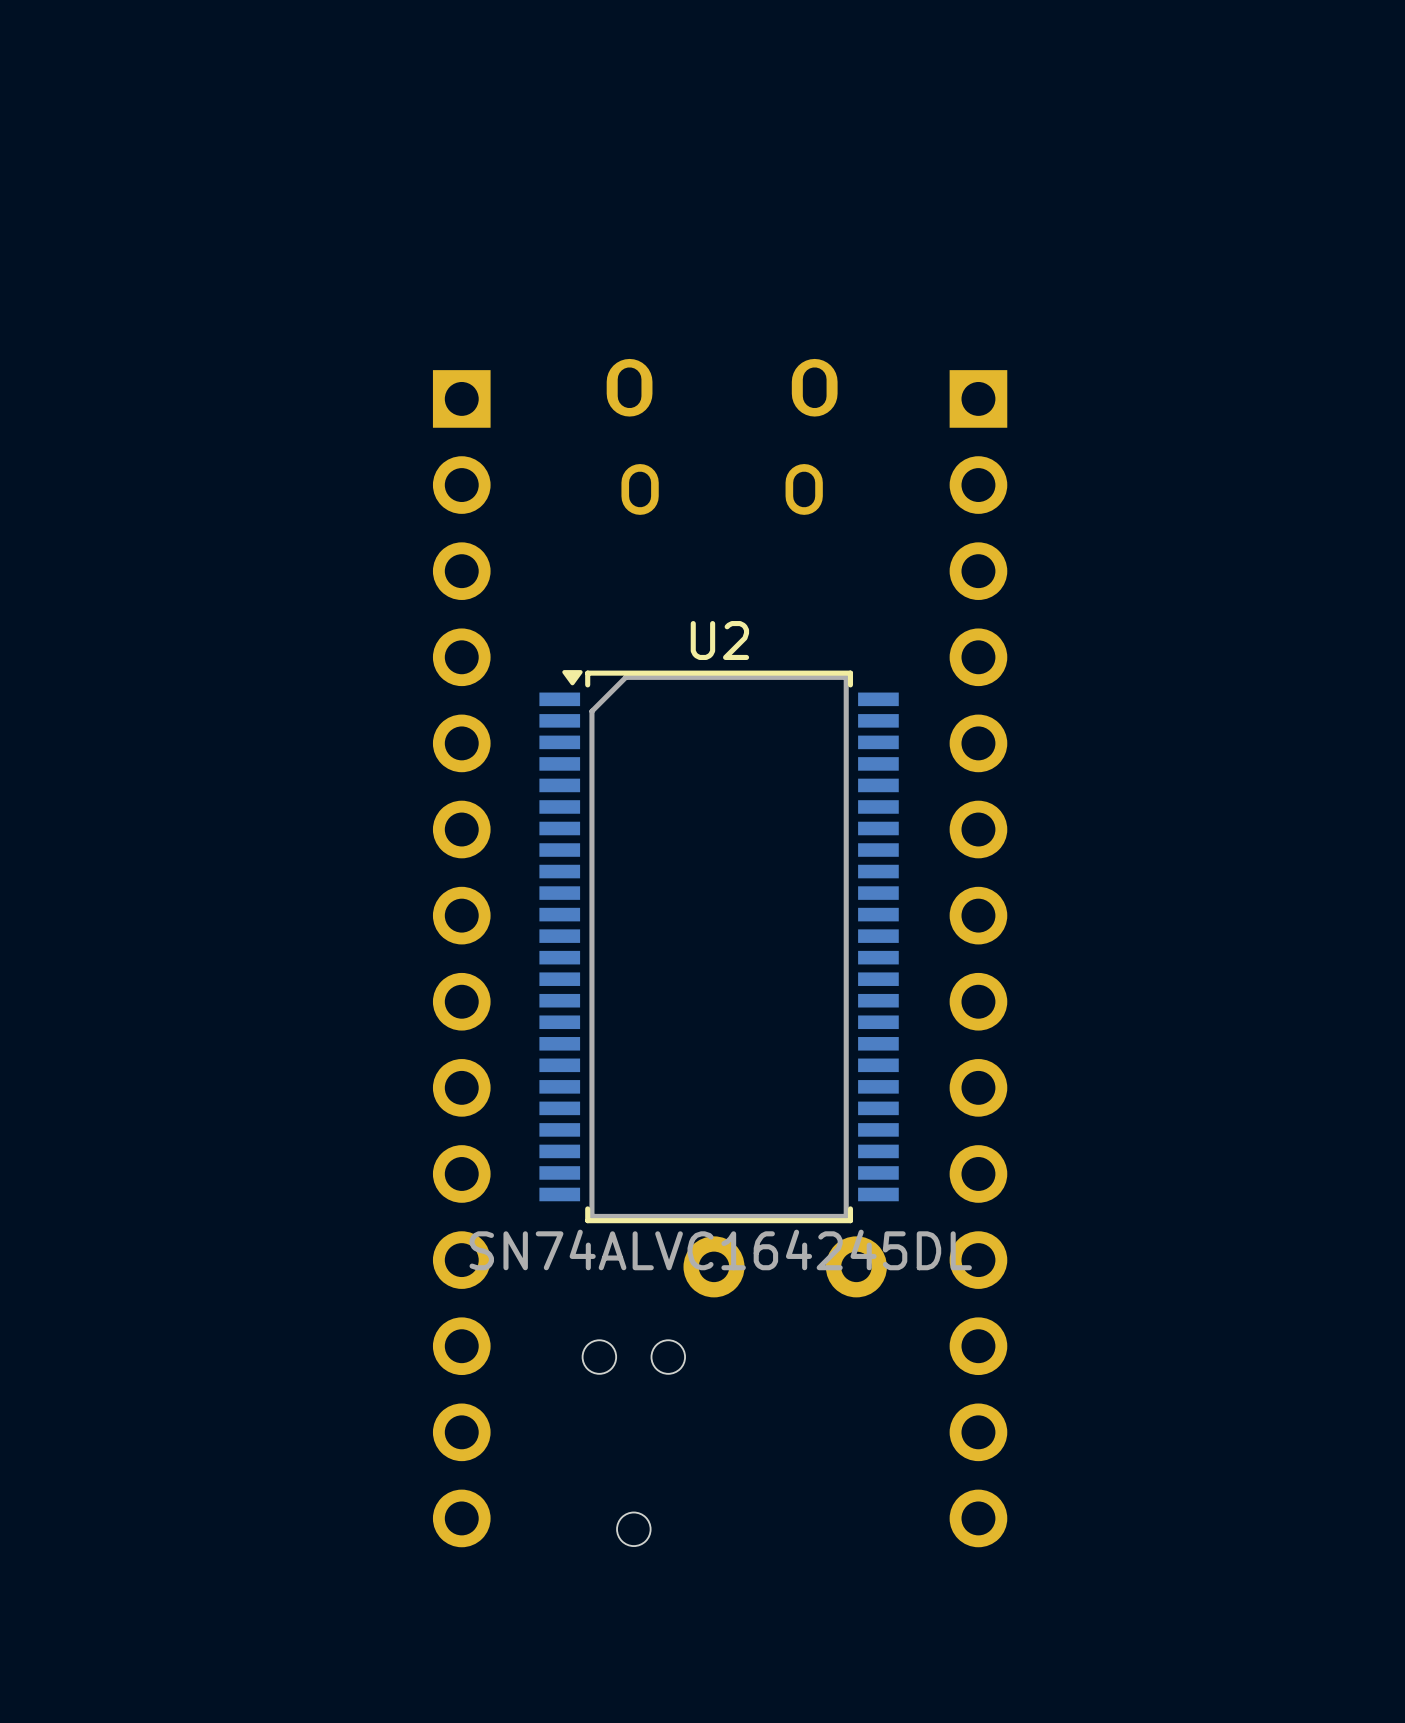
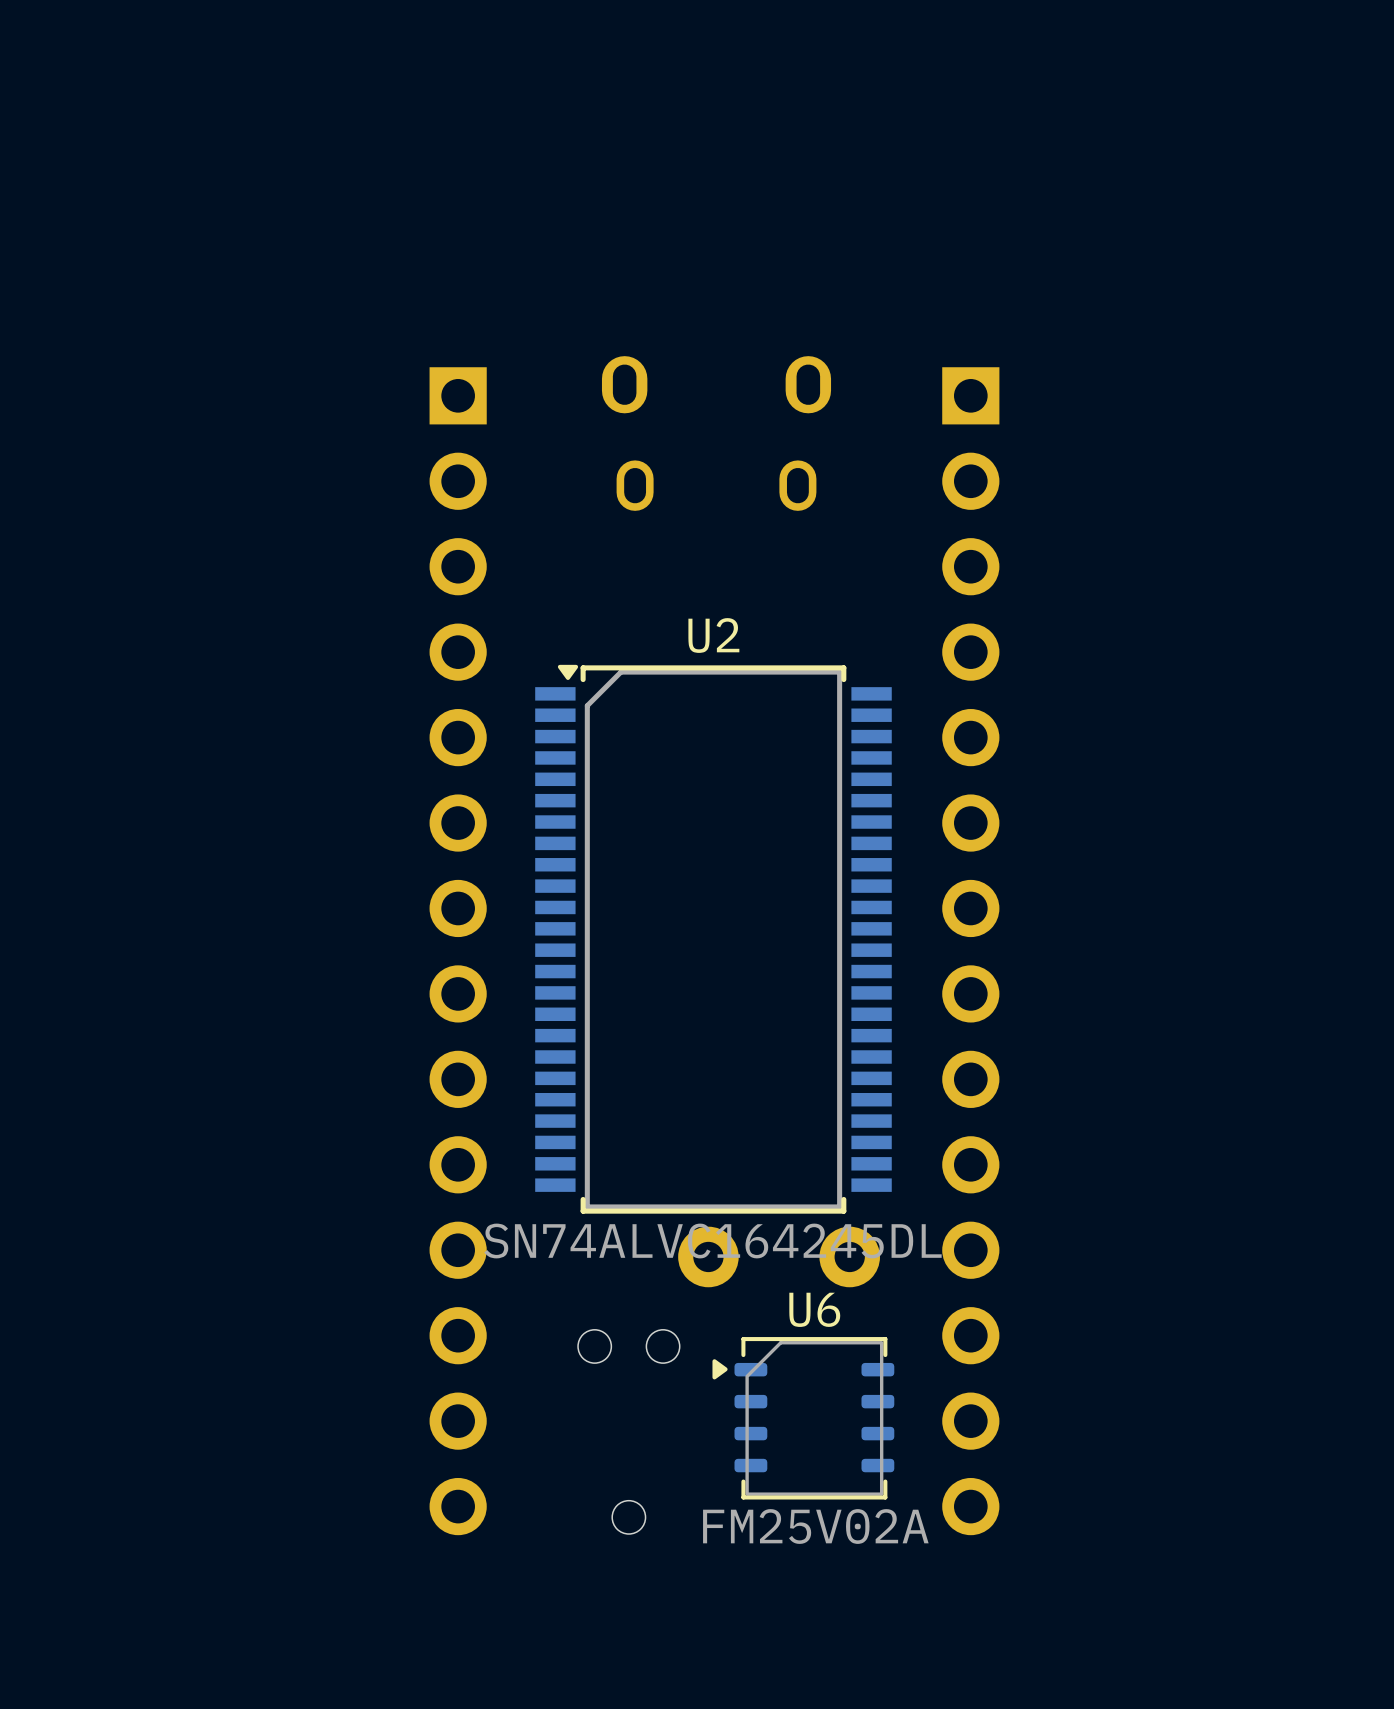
U6: none -> FM25V02A (803, 1418)

